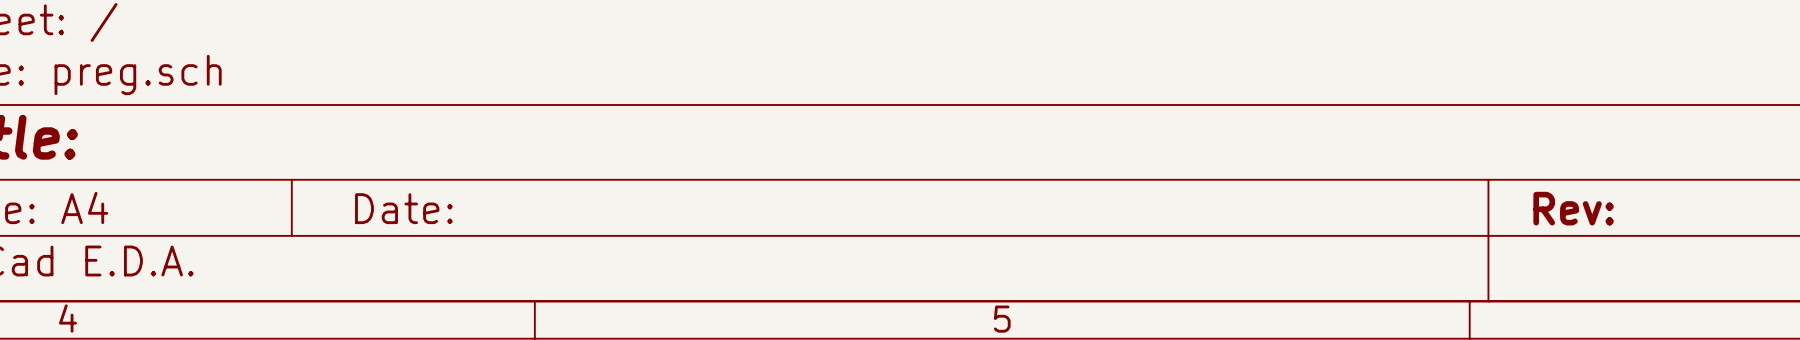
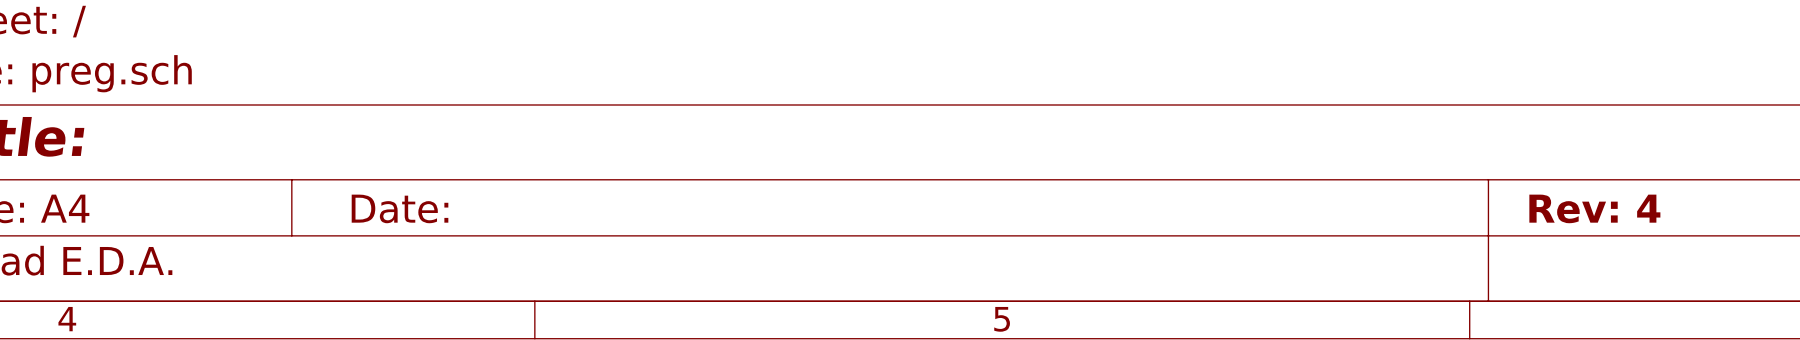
title block: Rev: (1573, 208) -> Rev: 4 (1594, 208)

